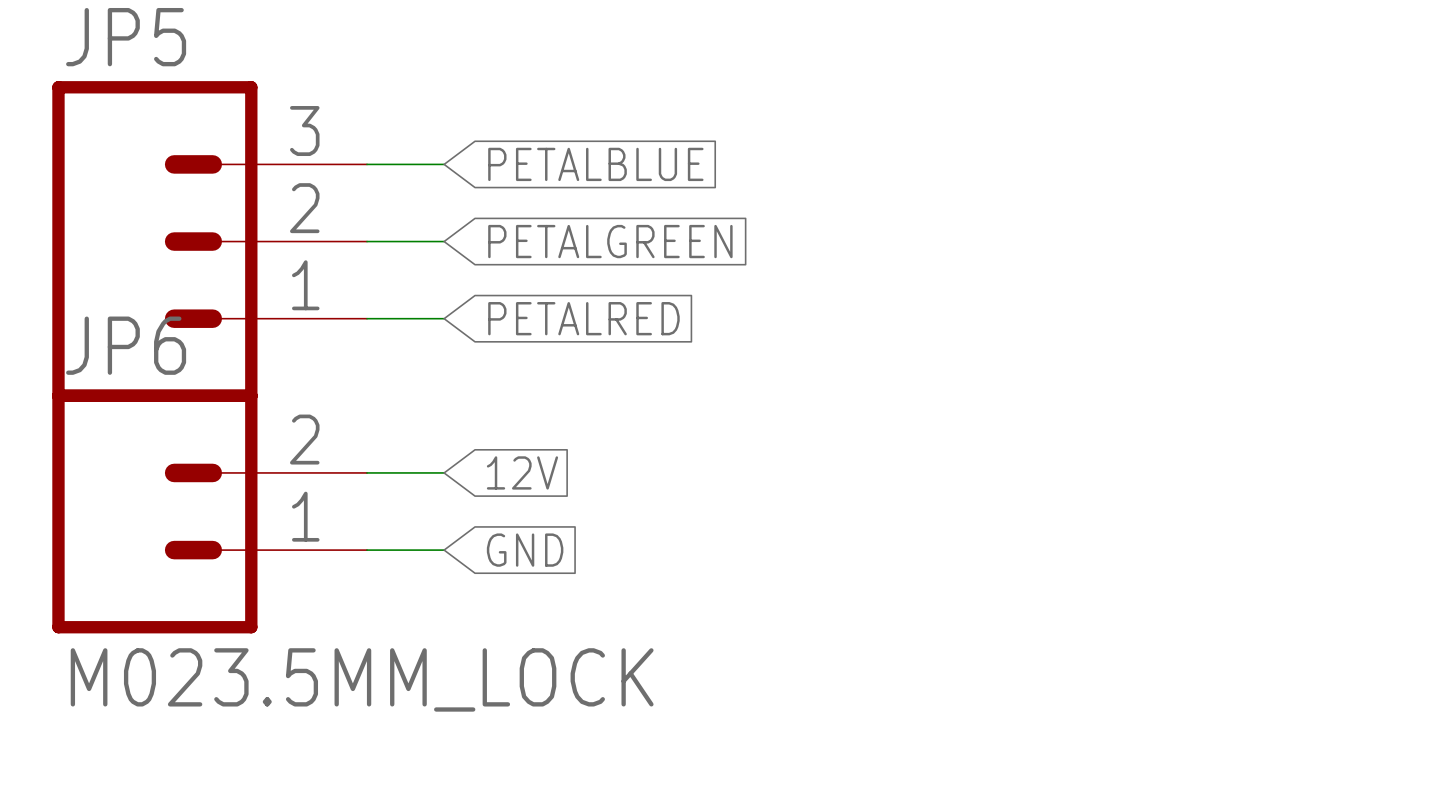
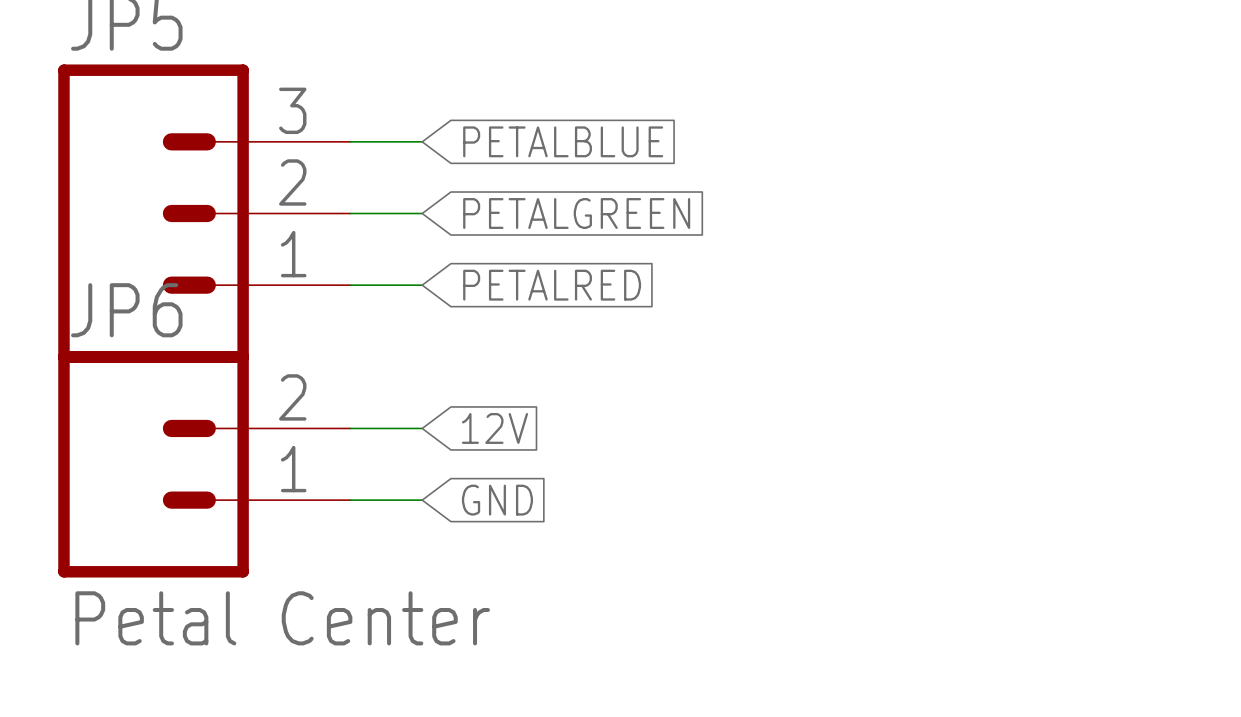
JP6 value: M023.5MM_LOCK (362, 679) -> Petal Center (282, 618)

